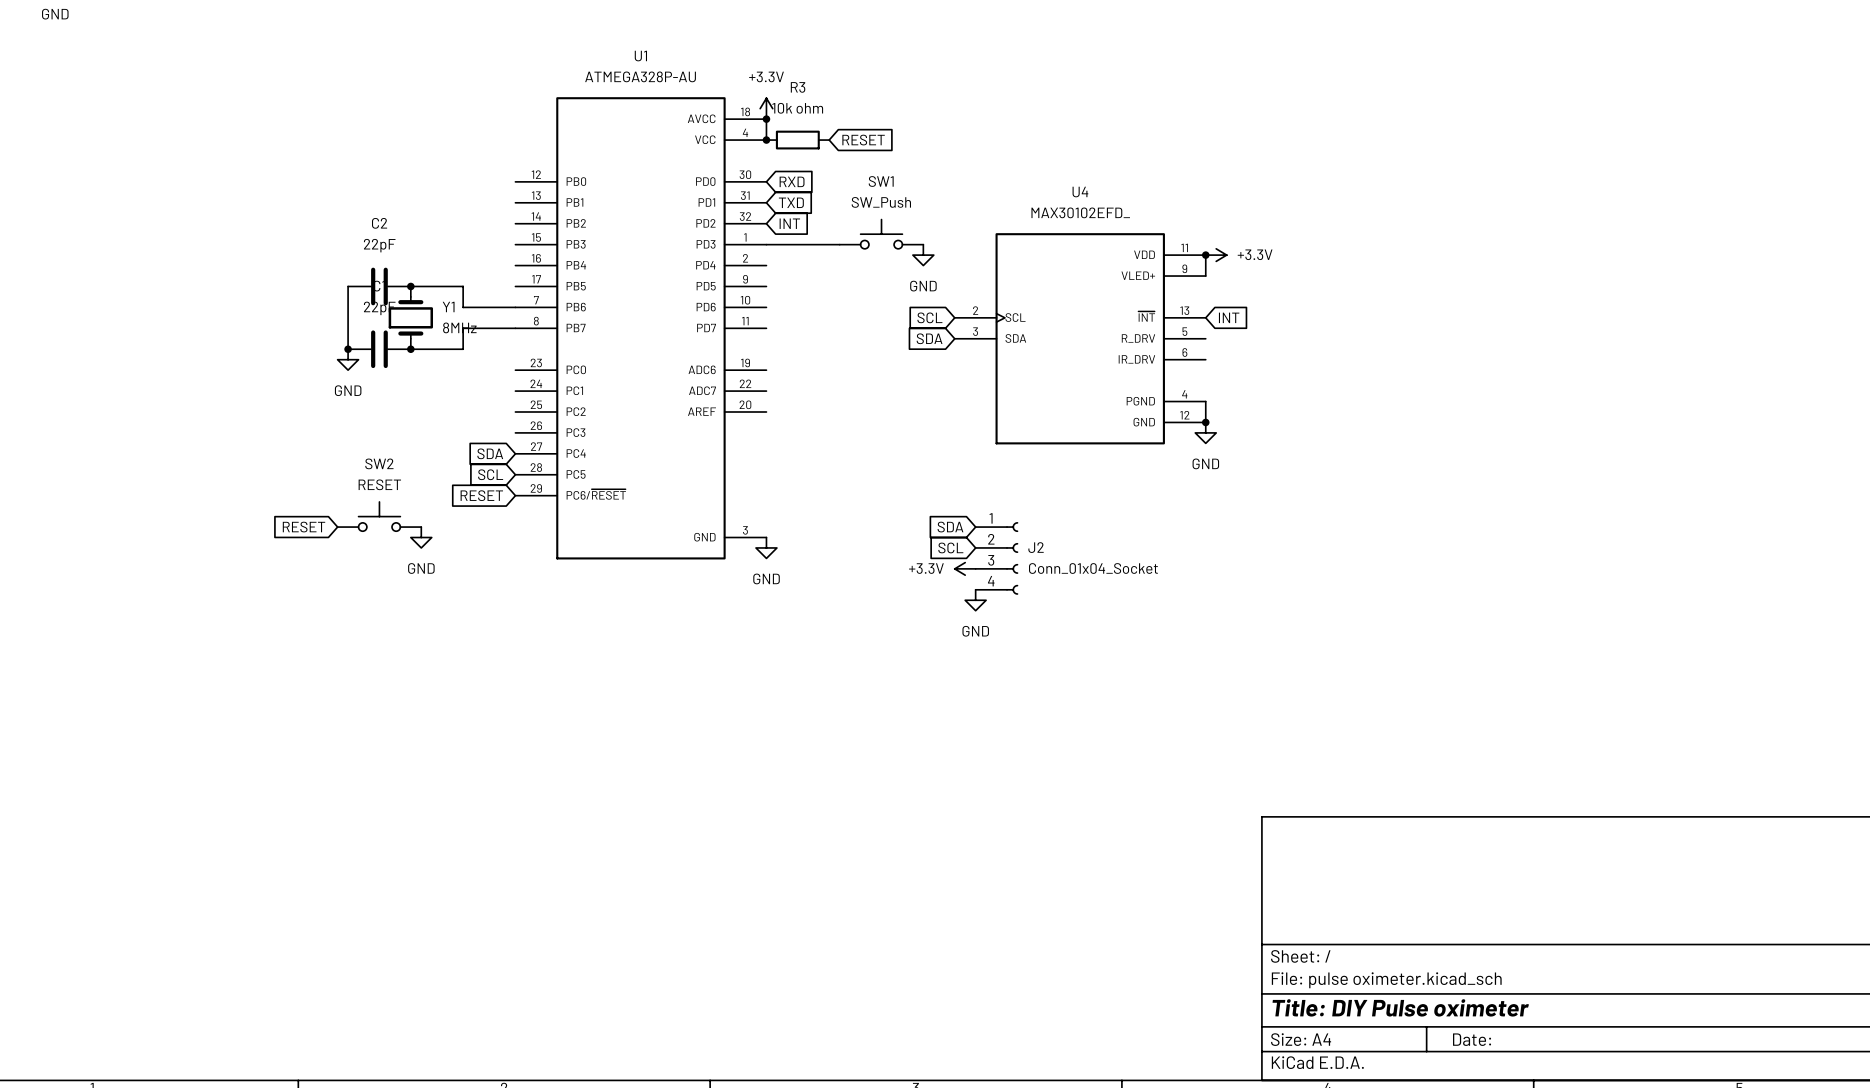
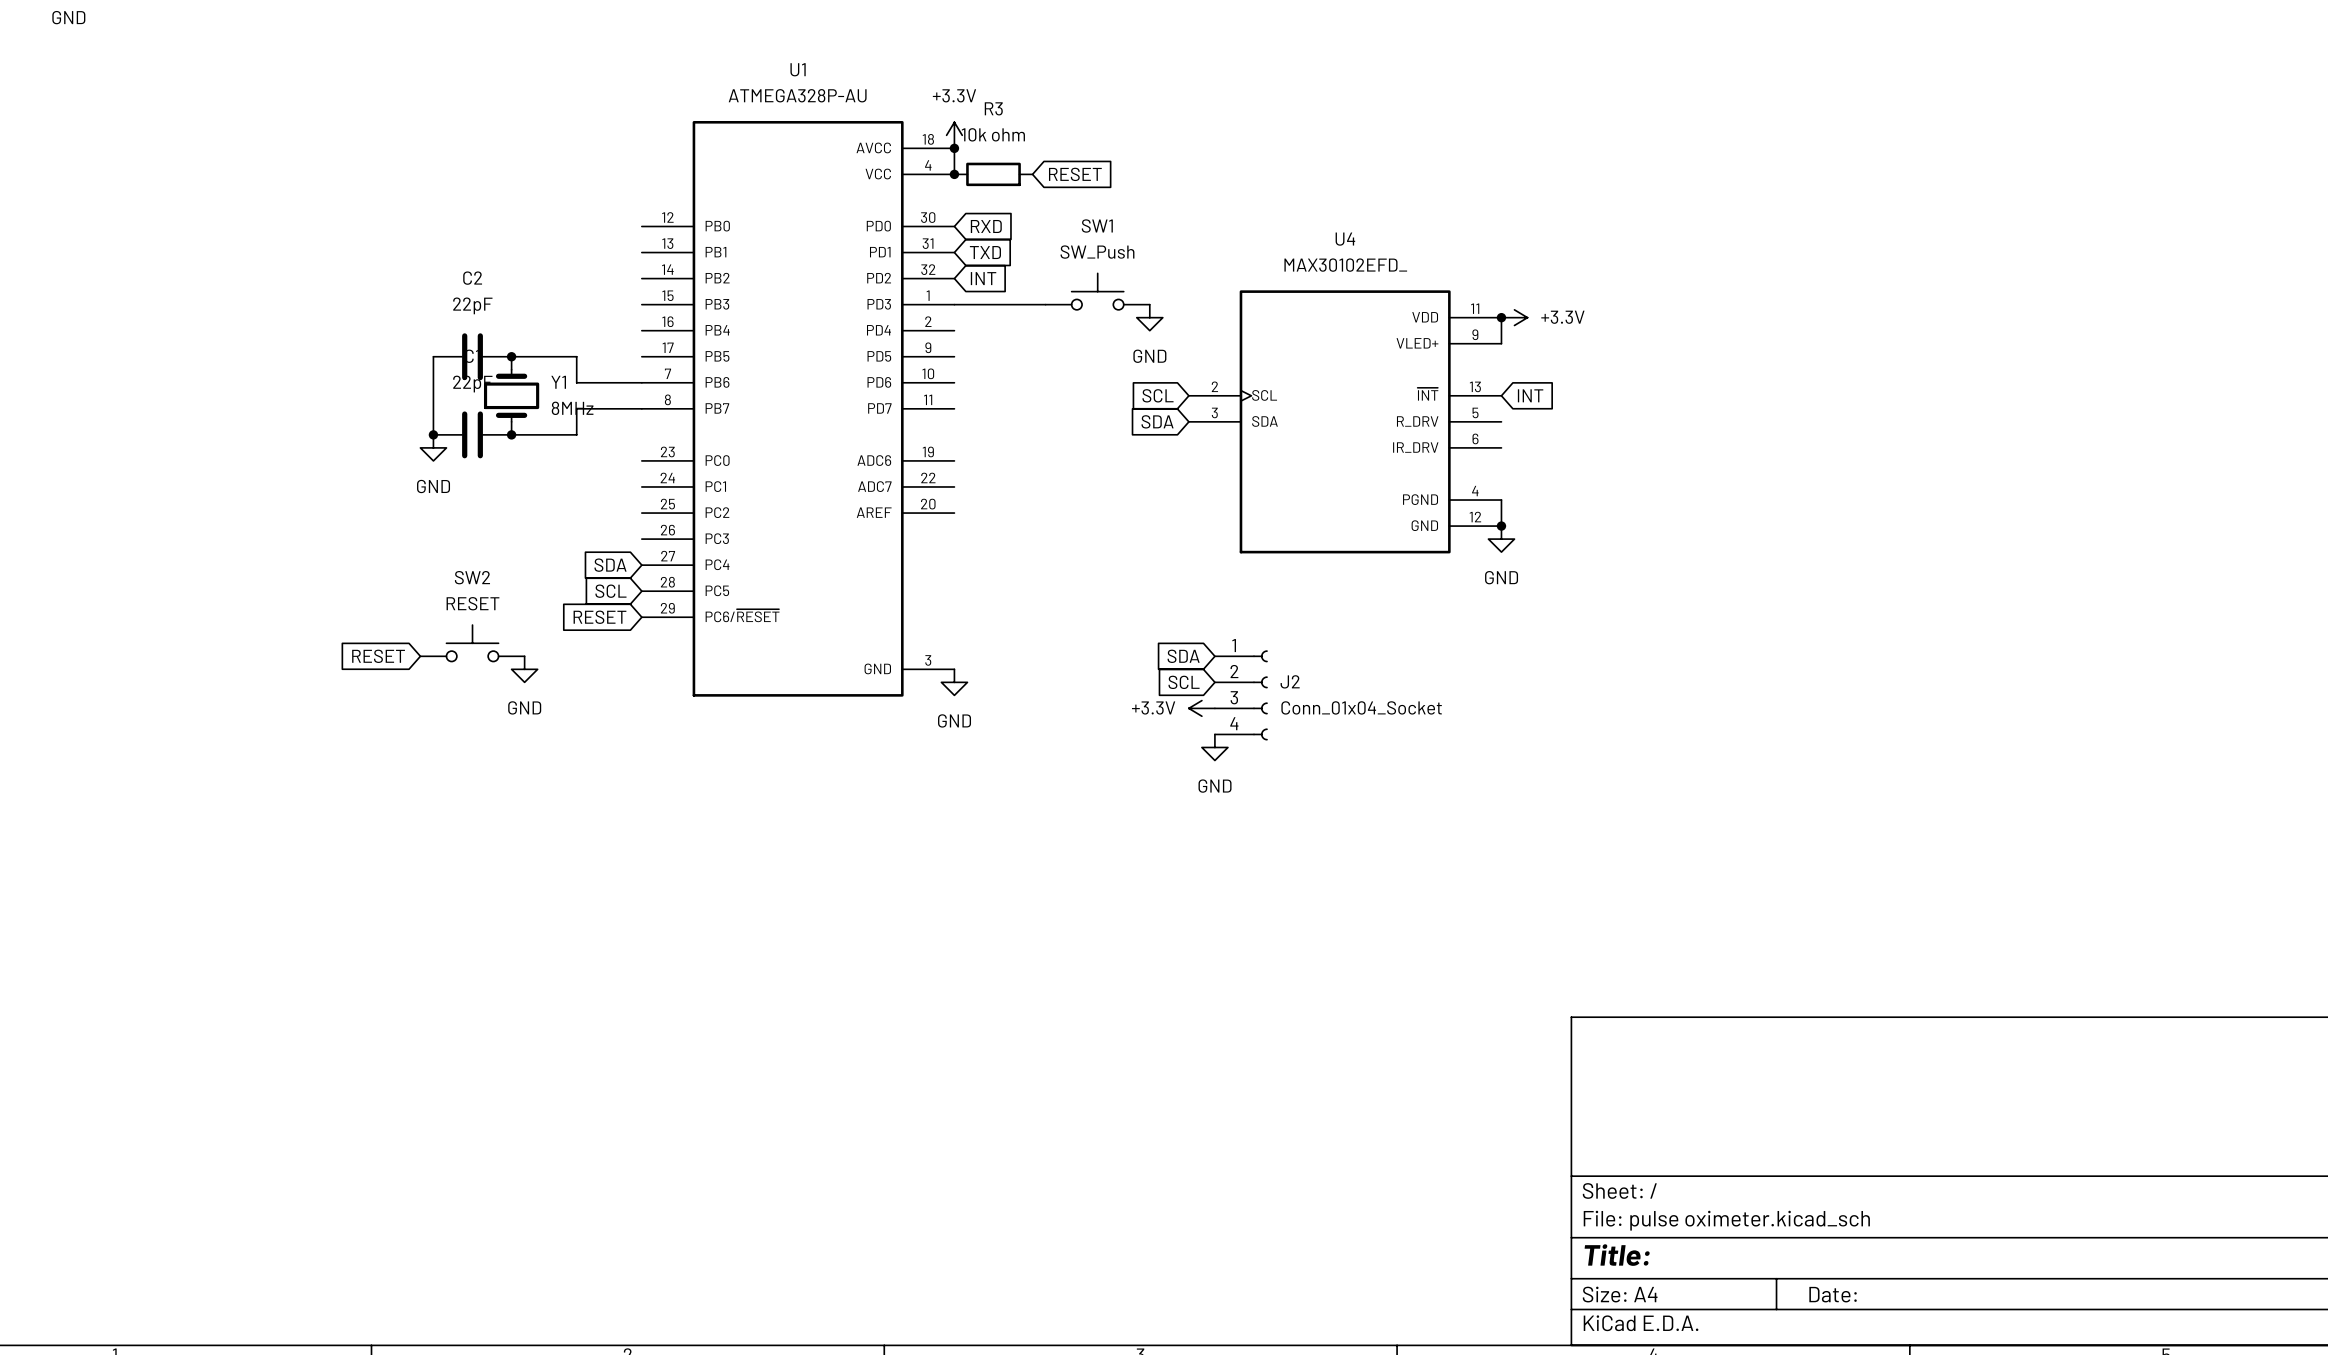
title block: Title: DIY Pulse oximeter (1400, 1007) -> Title: (1617, 1255)

